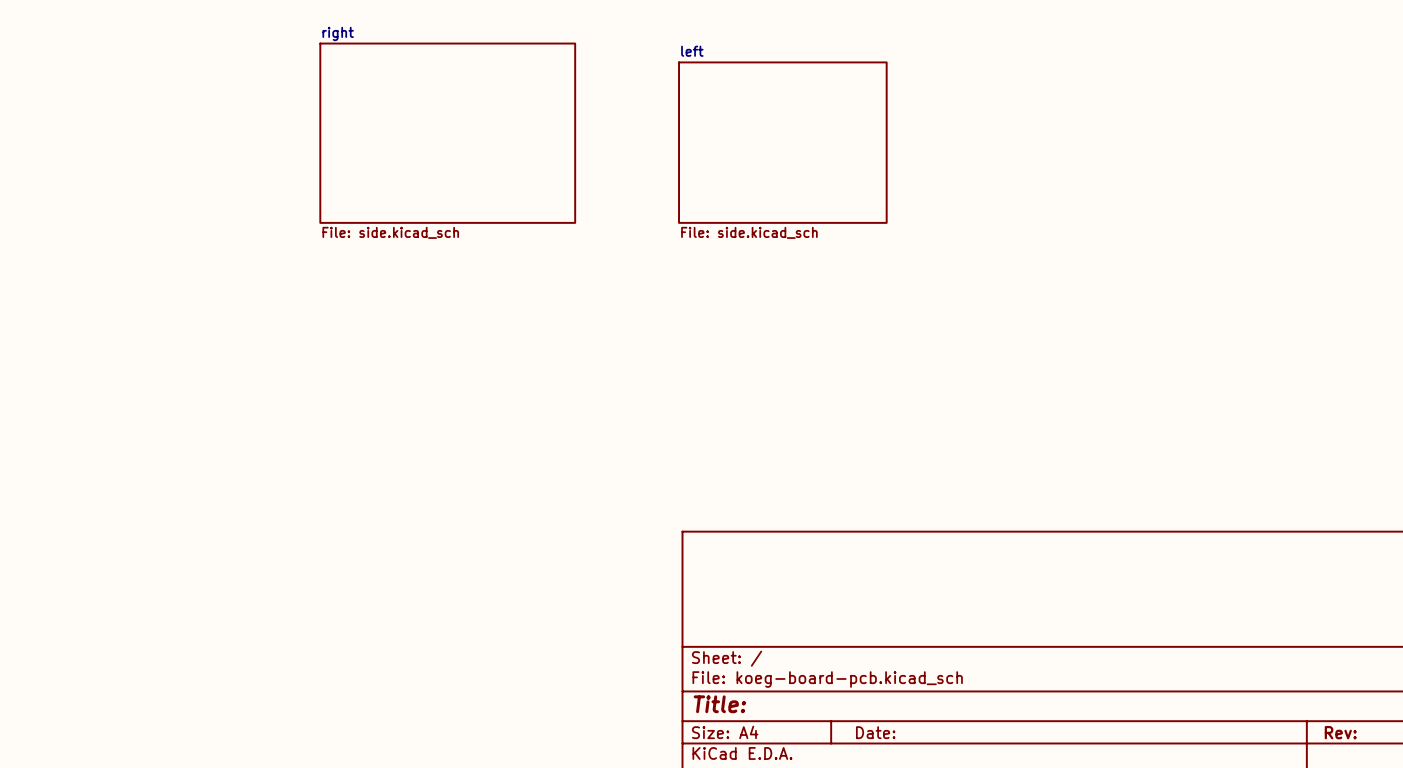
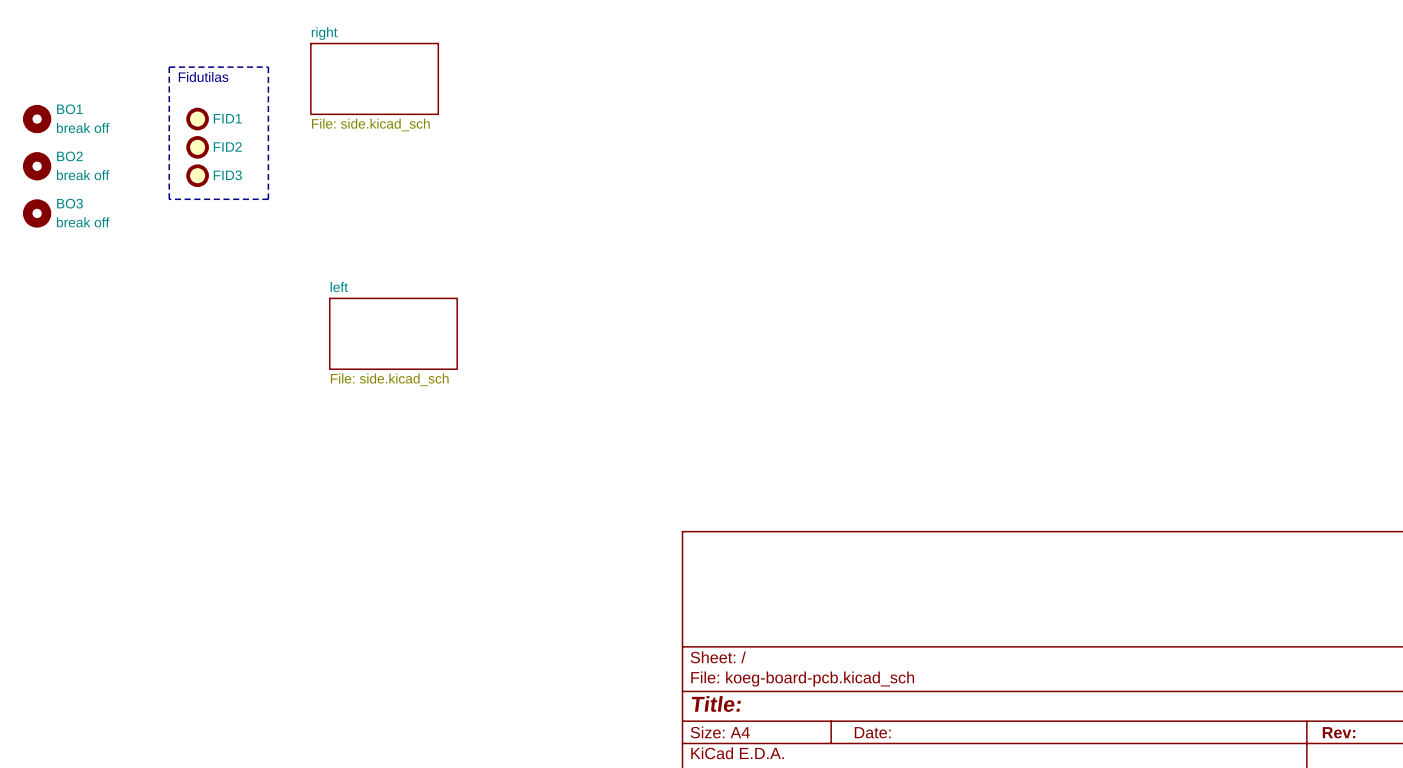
line: none -> (169, 67) (268, 67) (268, 199) (169, 199) (169, 67)
text: none -> Fidutilas (203, 76)
sheet right: none -> File: side.kicad_sch (374, 78)
BO1: none -> break off (37, 119)
FID1: none -> (197, 119)
sheet right: File: side.kicad_sch (447, 133) -> none
sheet left: File: side.kicad_sch (782, 142) -> none
FID2: none -> (197, 147)
BO2: none -> break off (37, 166)
FID3: none -> (197, 175)
BO3: none -> break off (37, 213)
sheet left: none -> File: side.kicad_sch (393, 333)

